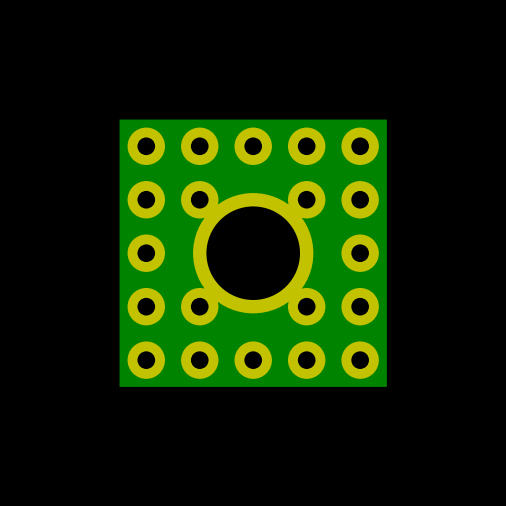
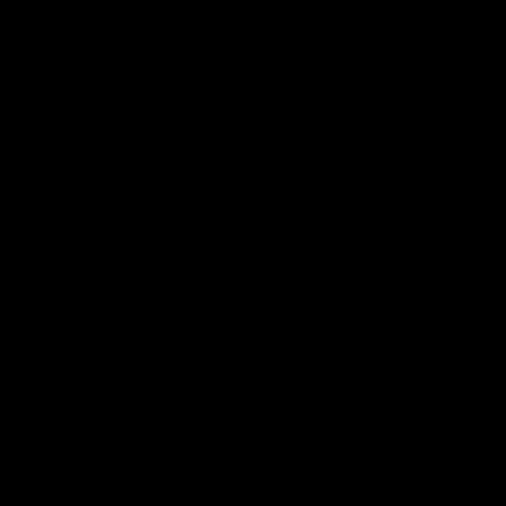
part: (253, 253) -> none

